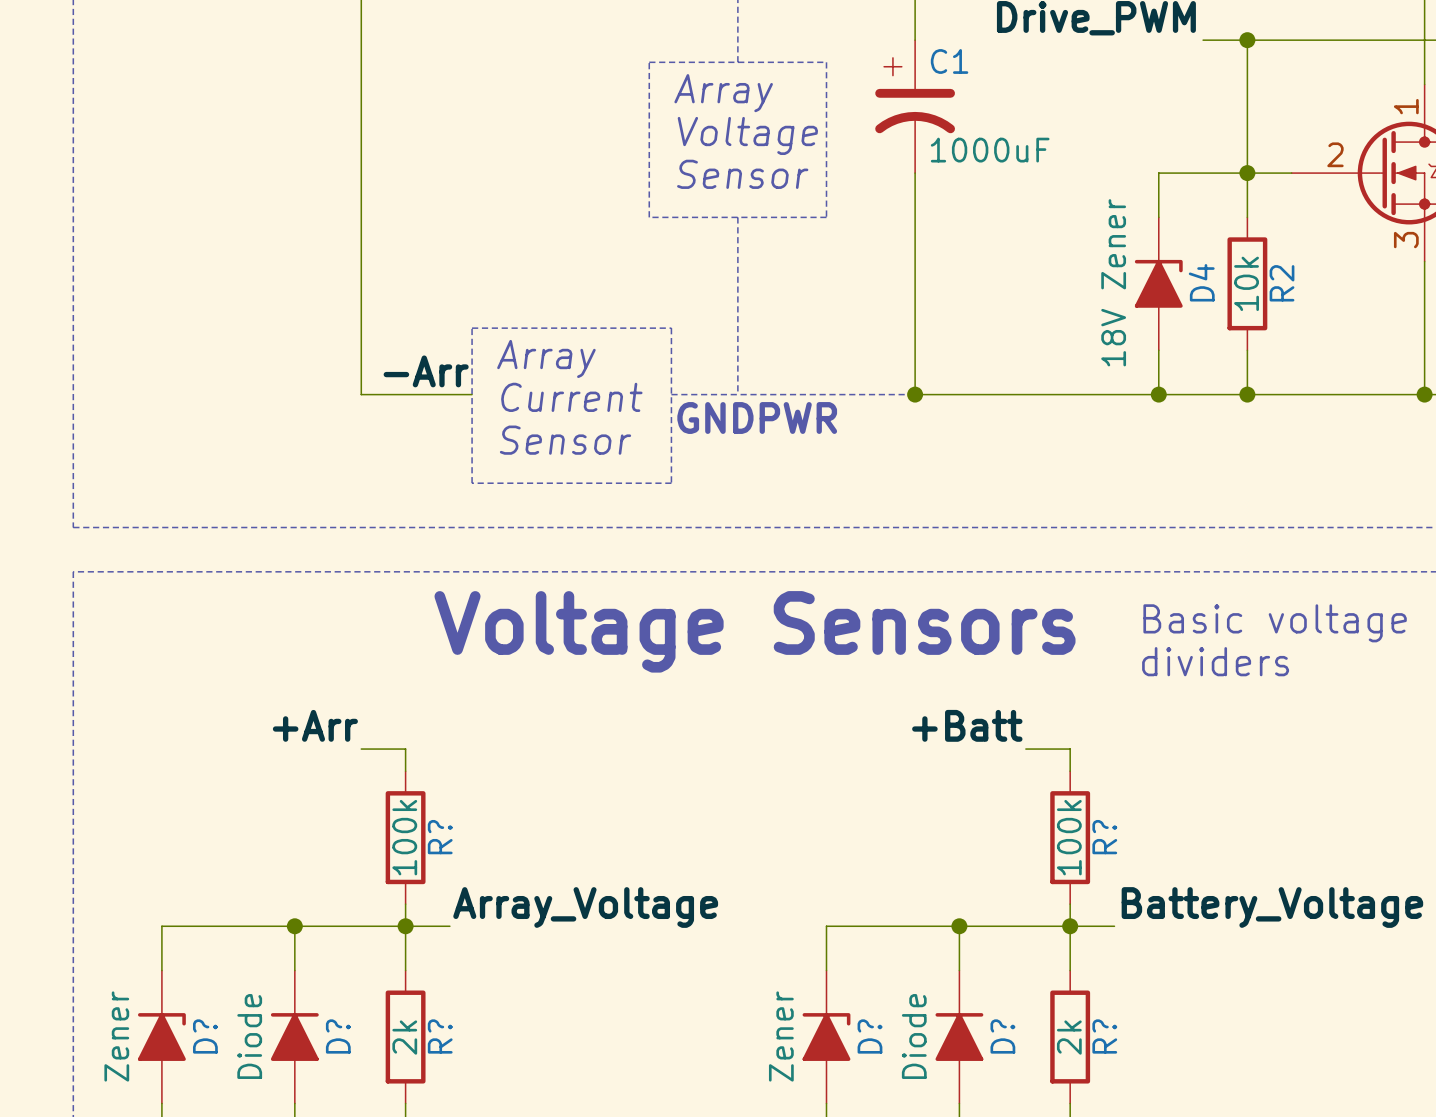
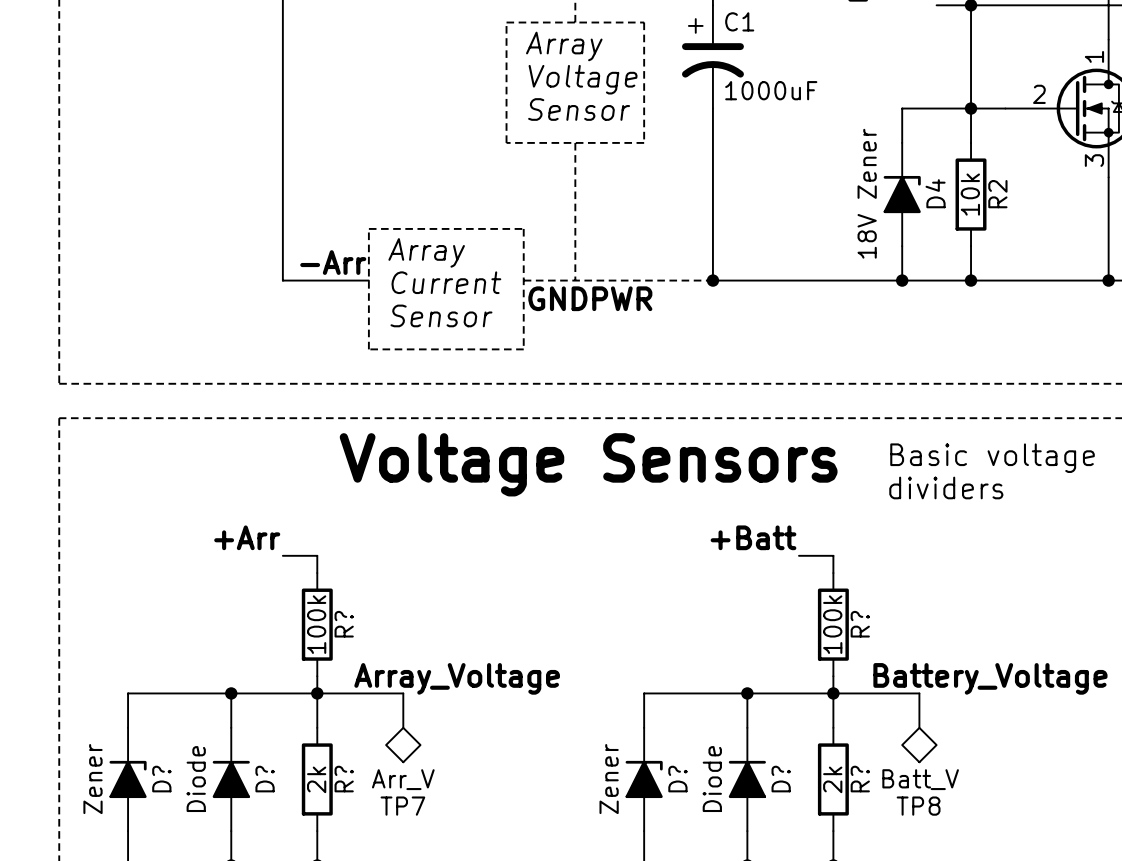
wire: none -> (351, 693) (403, 693)
wire: none -> (867, 693) (919, 693)
TP7: none -> Arr_V (403, 727)
TP8: none -> Batt_V (919, 727)

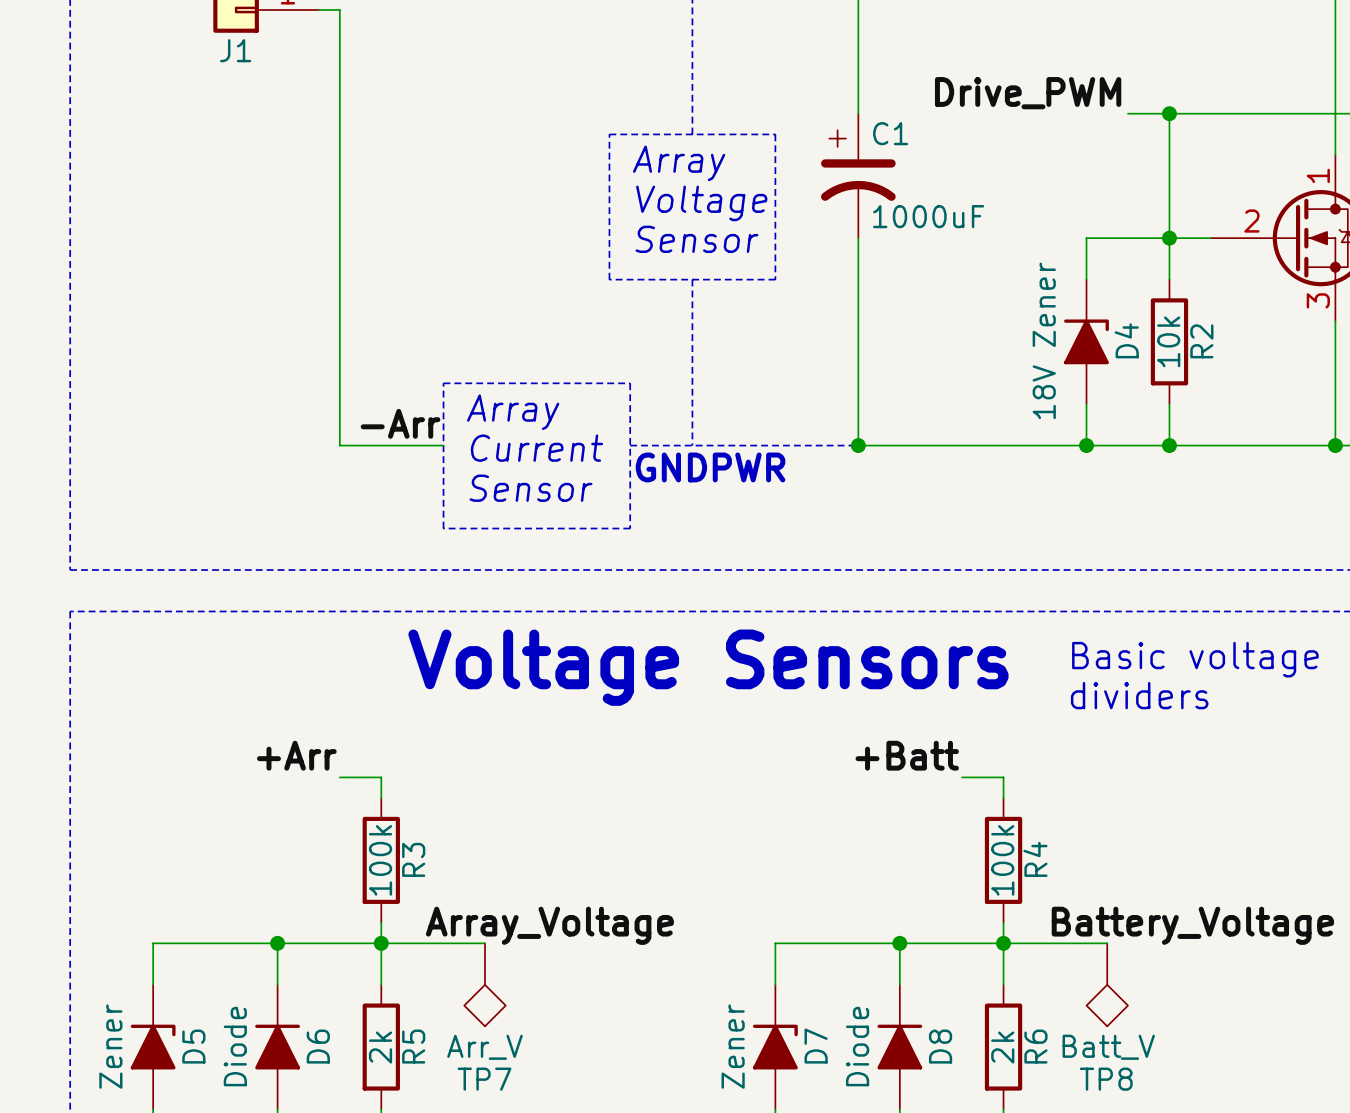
R? name: R? (344, 624) -> R3 (413, 859)
R? name: R? (860, 624) -> R4 (1035, 859)
D? name: D? (161, 779) -> D5 (193, 1046)
D? name: D? (265, 779) -> D6 (318, 1046)
R? name: R? (344, 779) -> R5 (413, 1046)
D? name: D? (677, 779) -> D7 (816, 1046)
D? name: D? (781, 779) -> D8 (940, 1046)
R? name: R? (860, 779) -> R6 (1035, 1046)

